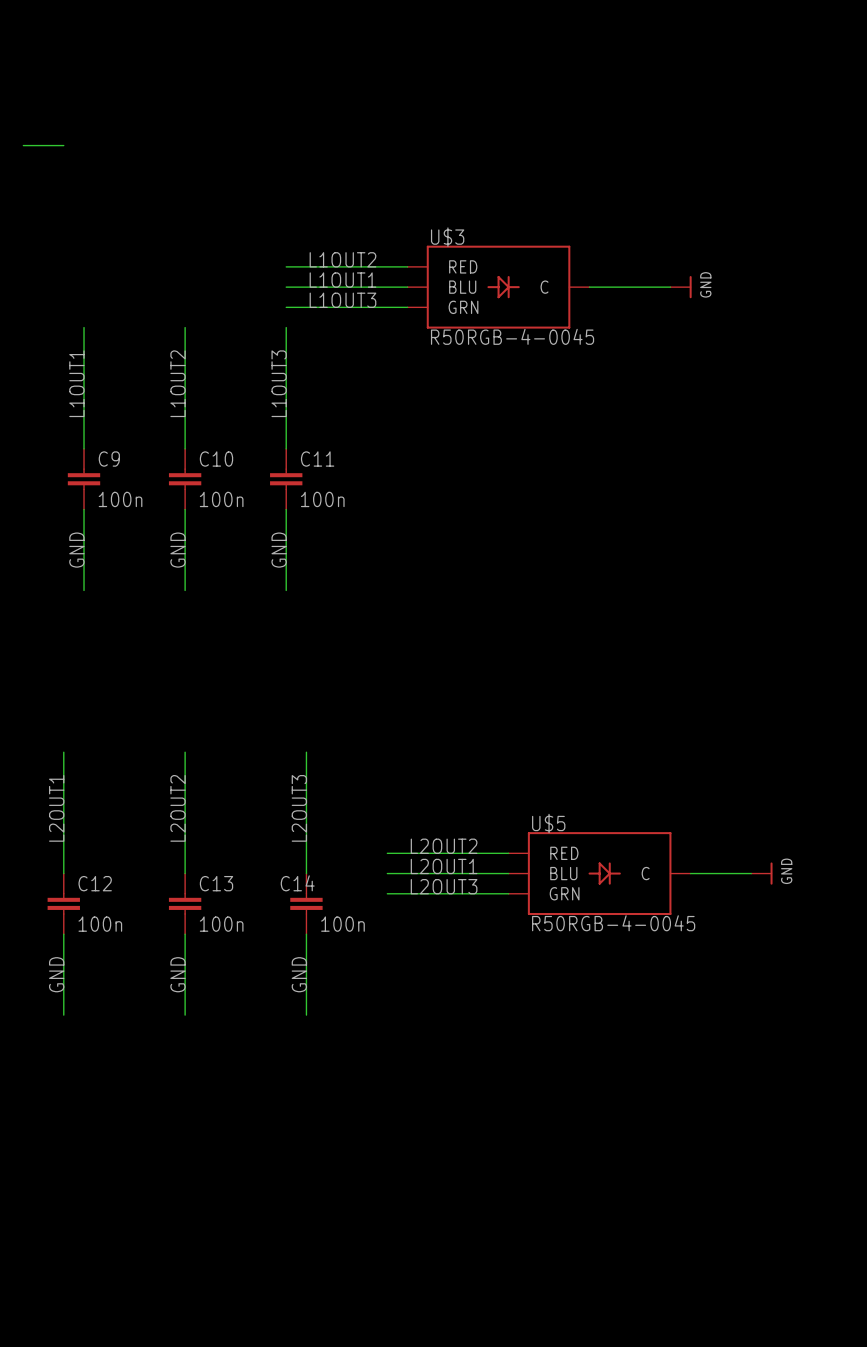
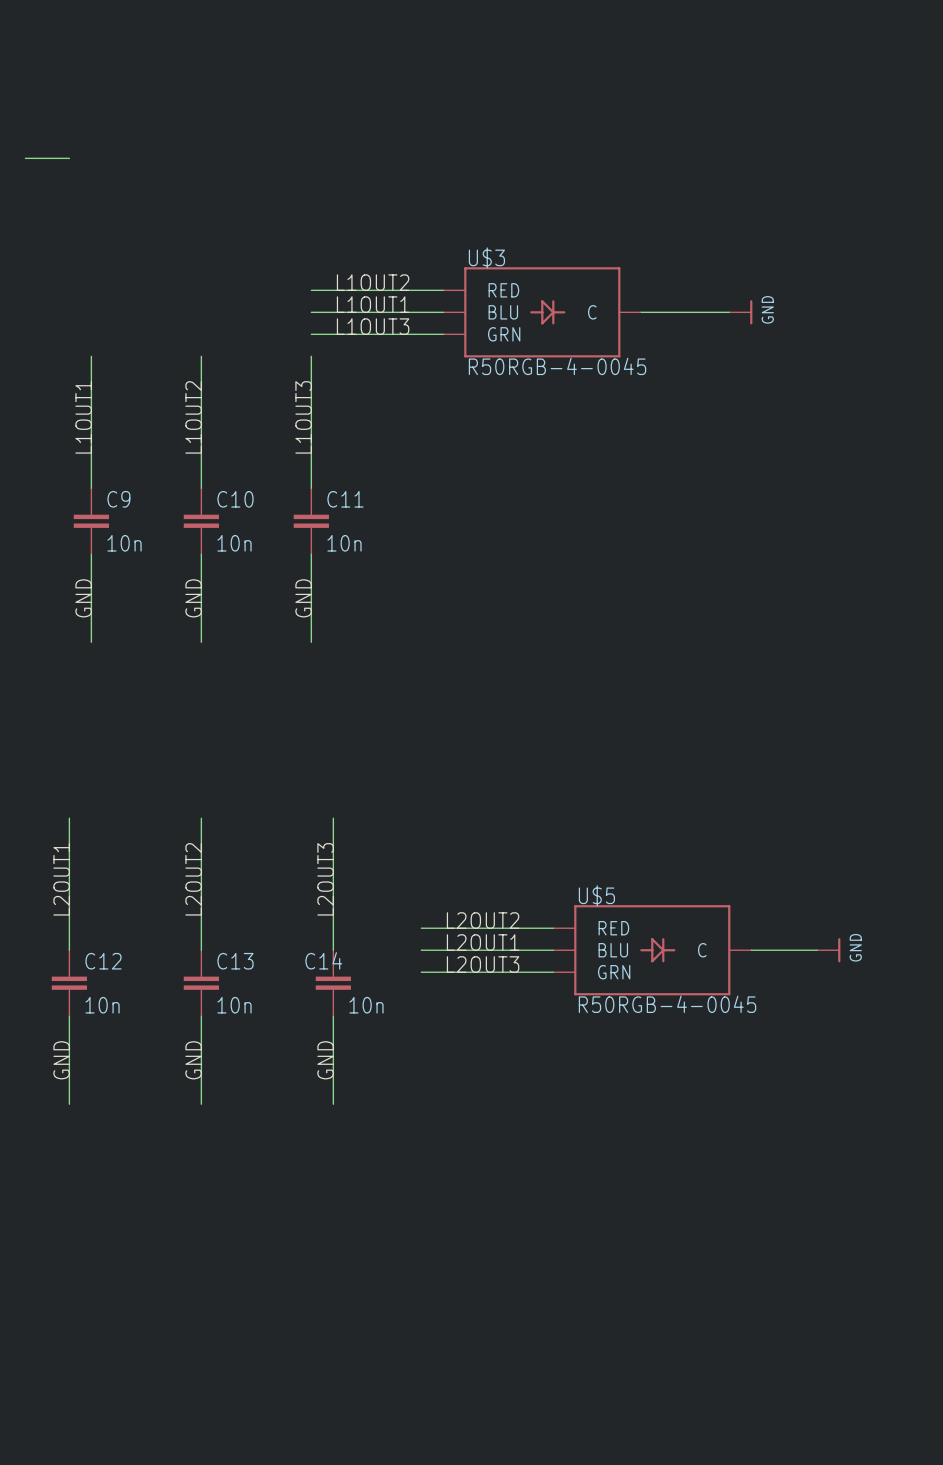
C9 value: 100n (120, 499) -> 10n (124, 543)
C10 value: 100n (221, 499) -> 10n (234, 543)
C11 value: 100n (322, 499) -> 10n (344, 543)
C12 value: 100n (100, 924) -> 10n (102, 1005)
C13 value: 100n (221, 924) -> 10n (234, 1005)
C14 value: 100n (342, 924) -> 10n (366, 1005)

